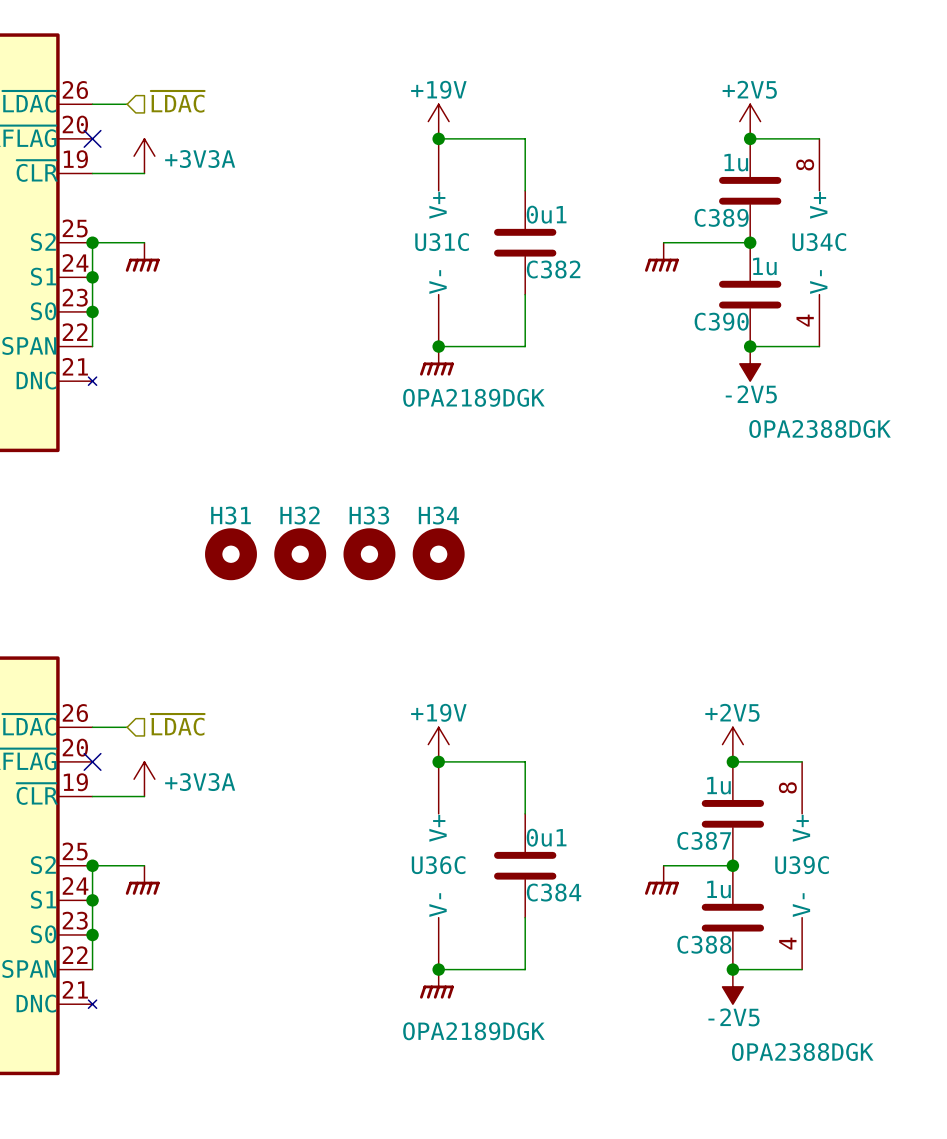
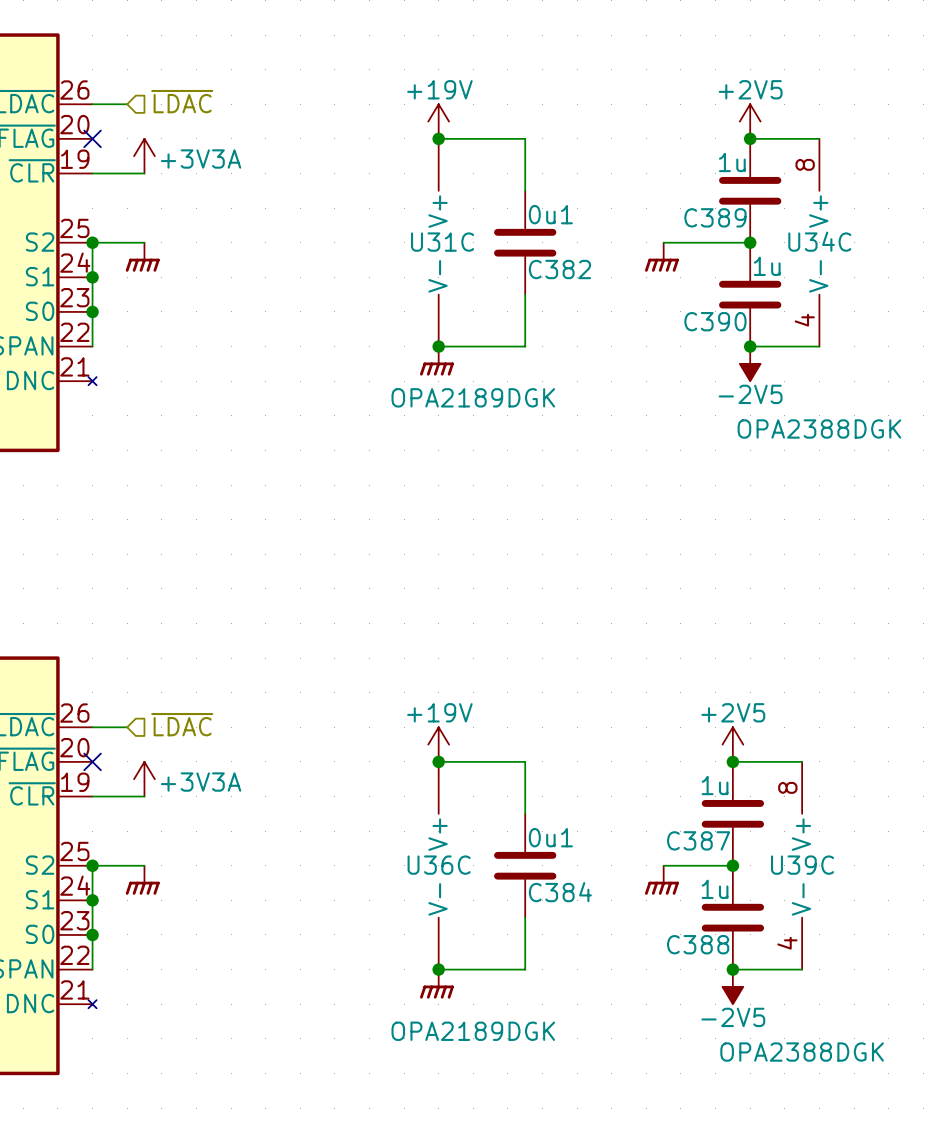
H31: (231, 554) -> none
H32: (300, 554) -> none
H33: (369, 554) -> none
H34: (438, 554) -> none

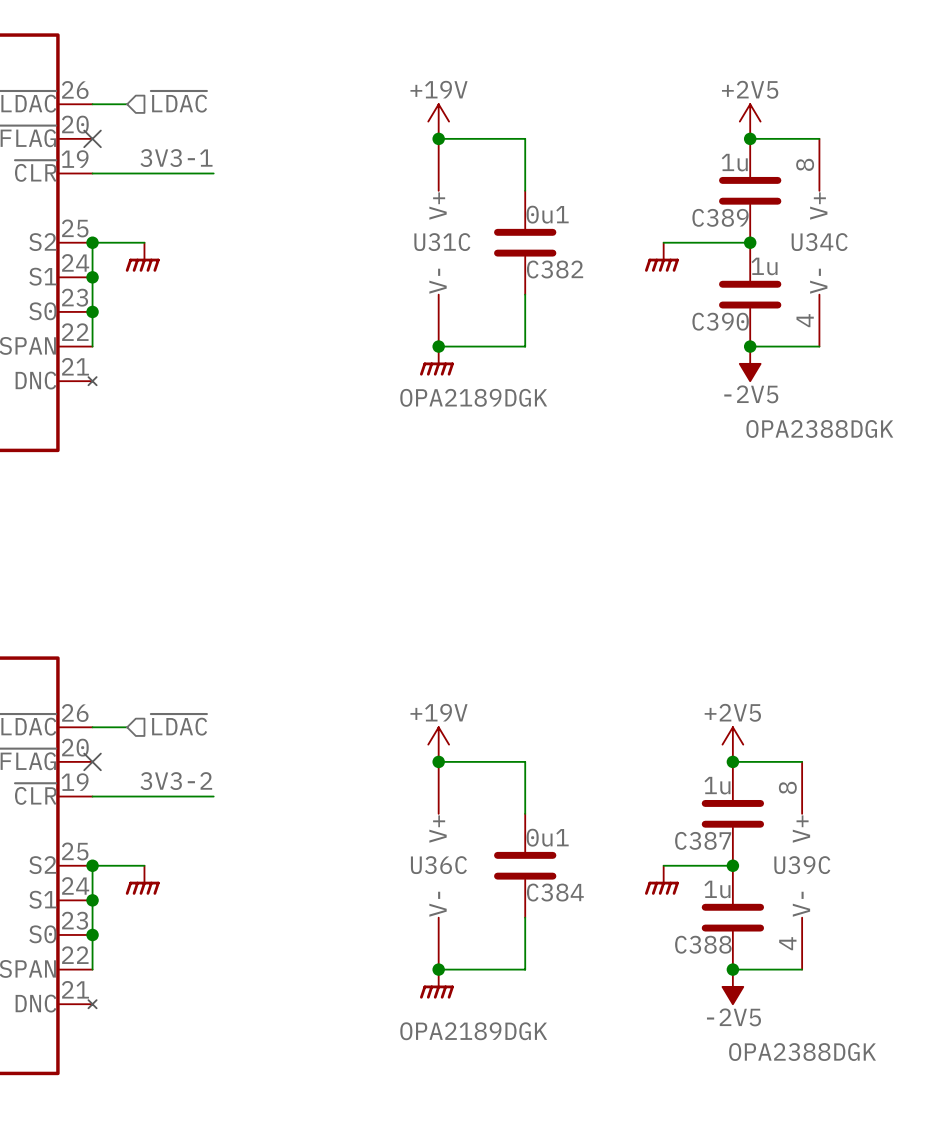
power symbol: +3V3A (144, 156) -> none
label: none -> 3V3-1 (176, 158)
wire: none -> (144, 173) (213, 173)
power symbol: +3V3A (144, 779) -> none
label: none -> 3V3-2 (176, 781)
wire: none -> (144, 796) (213, 796)

